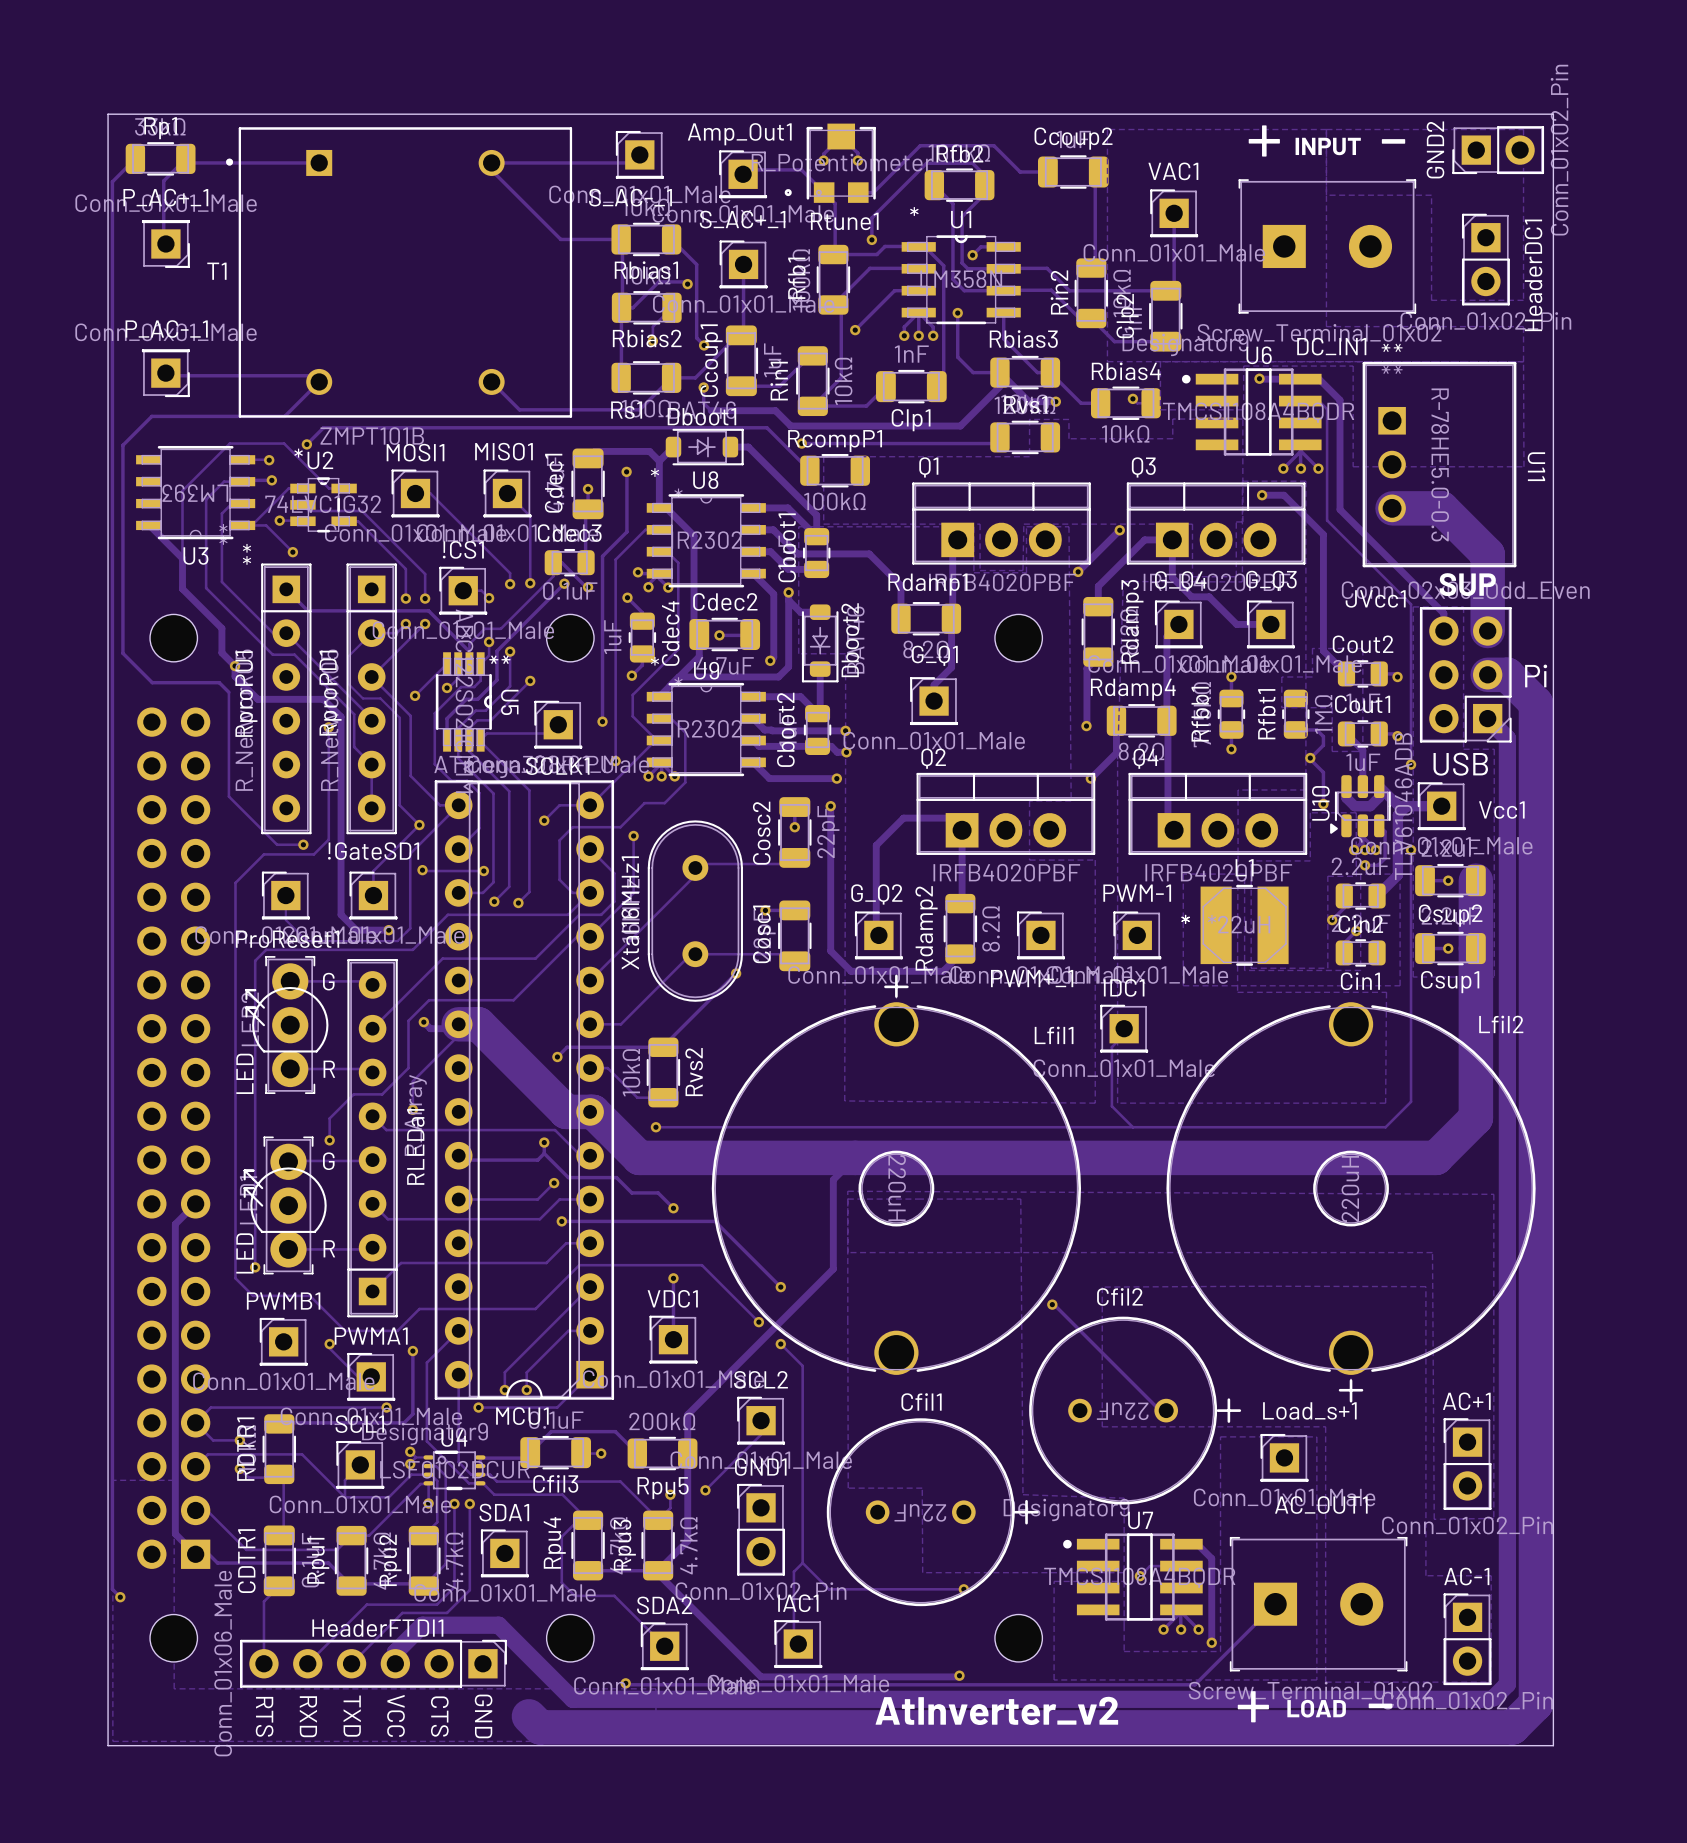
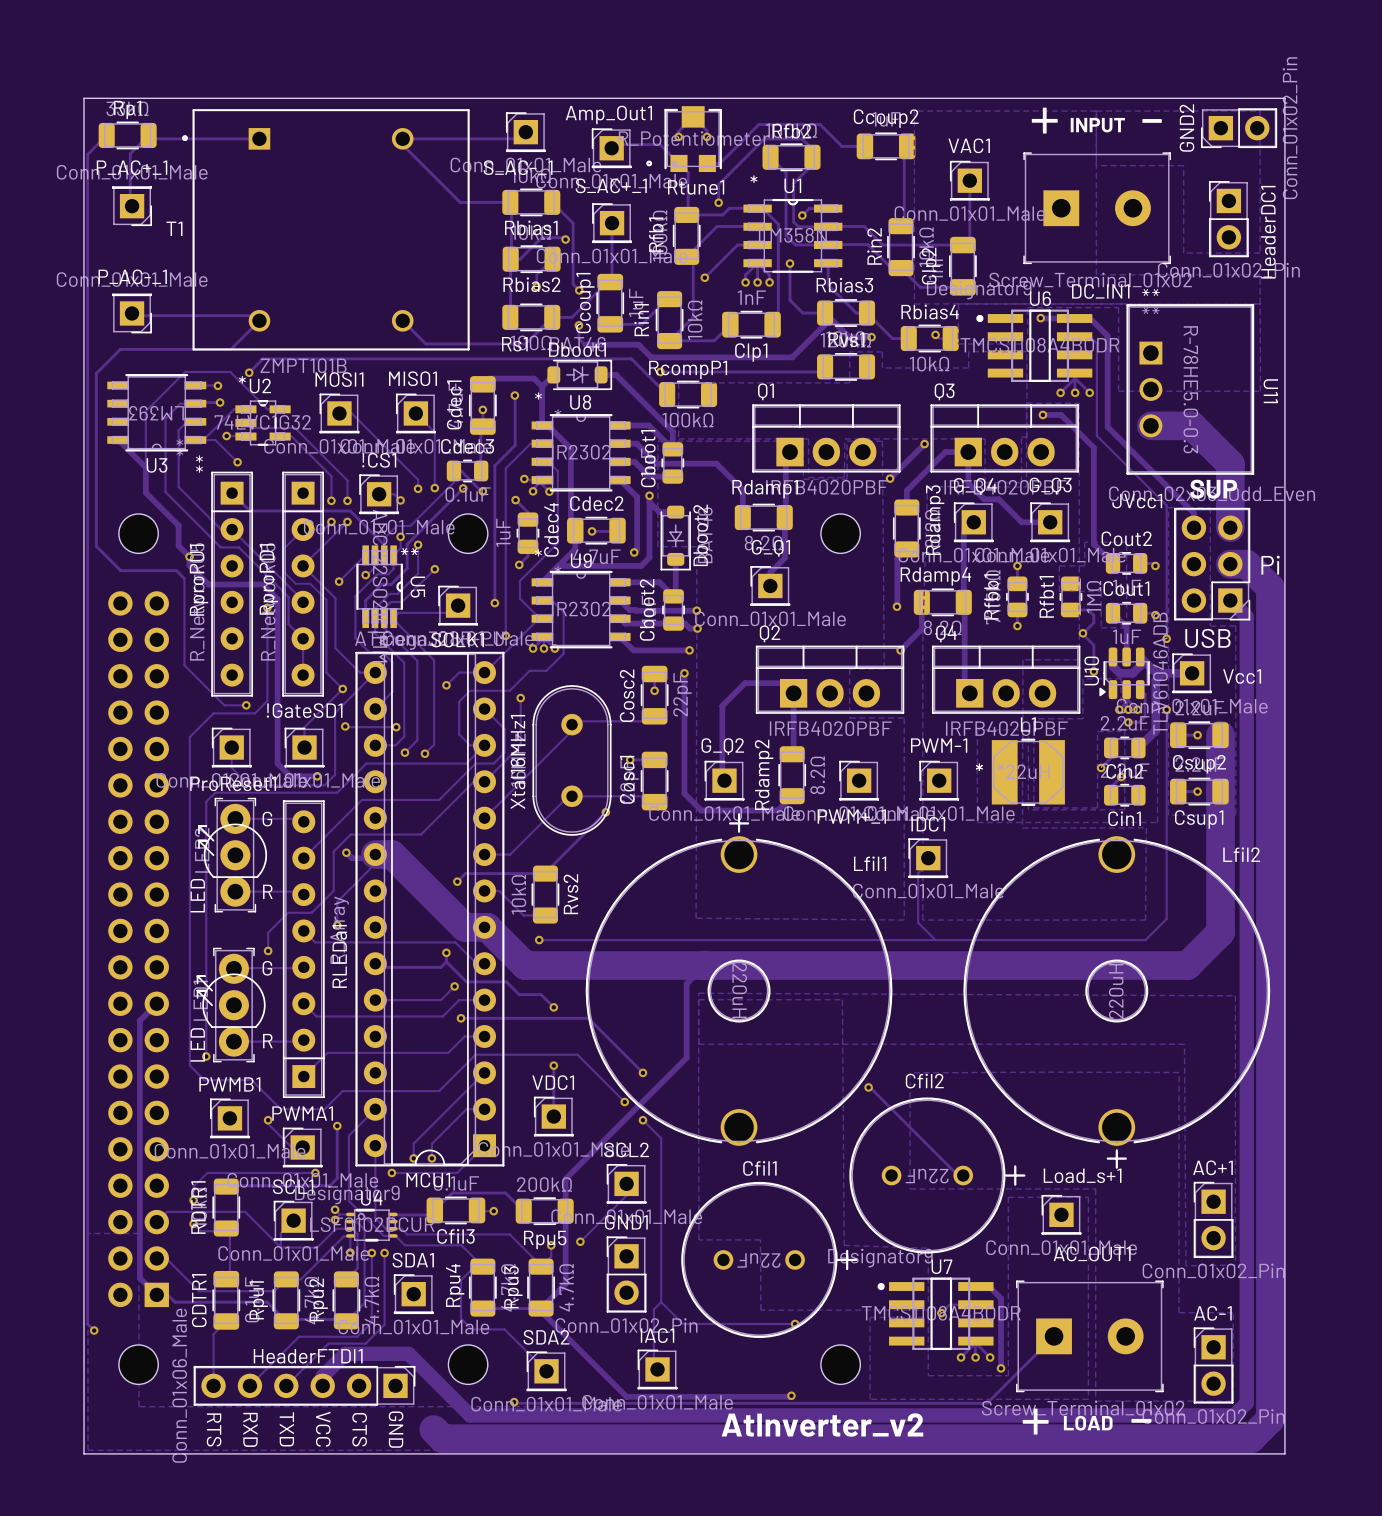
track: (256, 1407) (210, 1407) (195, 1422) (213, 1440) (239, 1440) -> (207, 1172) (193, 1186) (193, 1200)

